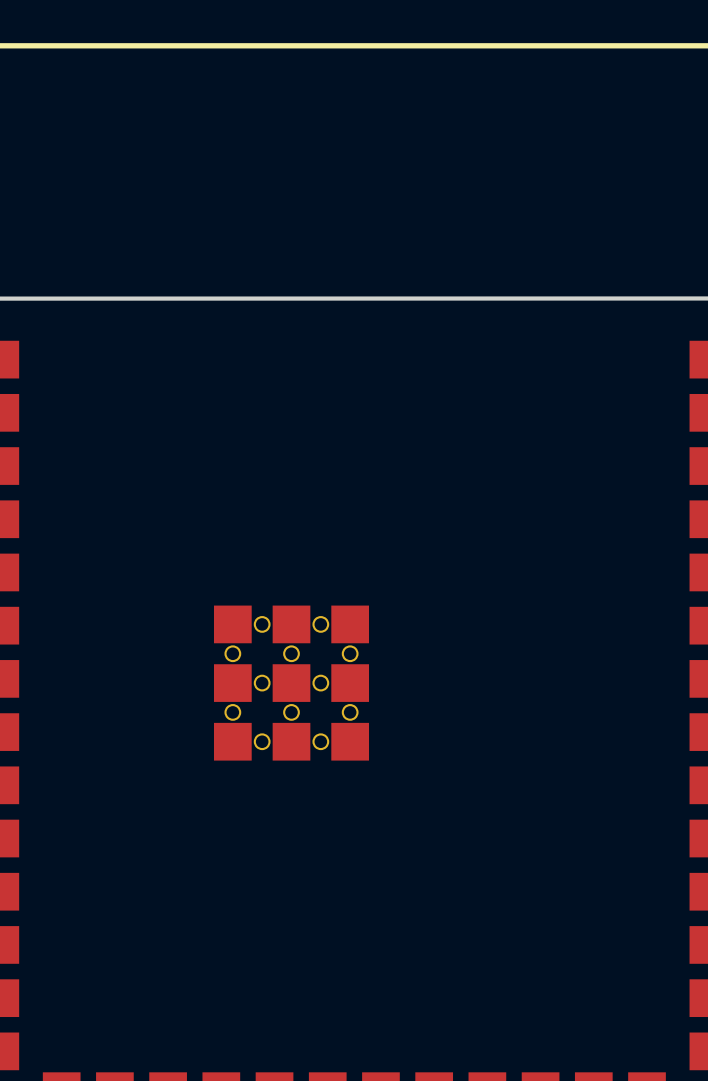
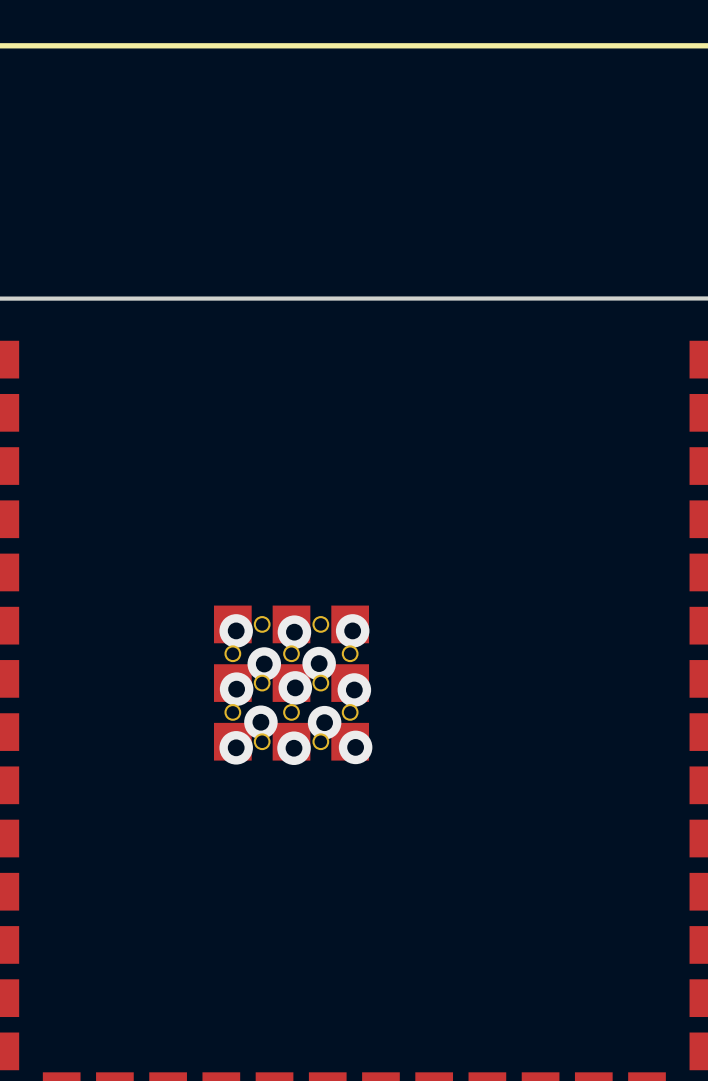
via: none -> (236, 630)
via: none -> (352, 630)
via: none -> (294, 632)
via: none -> (319, 663)
via: none -> (264, 664)
via: none -> (295, 687)
via: none -> (236, 689)
via: none -> (354, 689)
via: none -> (260, 722)
via: none -> (324, 722)
via: none -> (236, 747)
via: none -> (355, 747)
via: none -> (294, 748)

